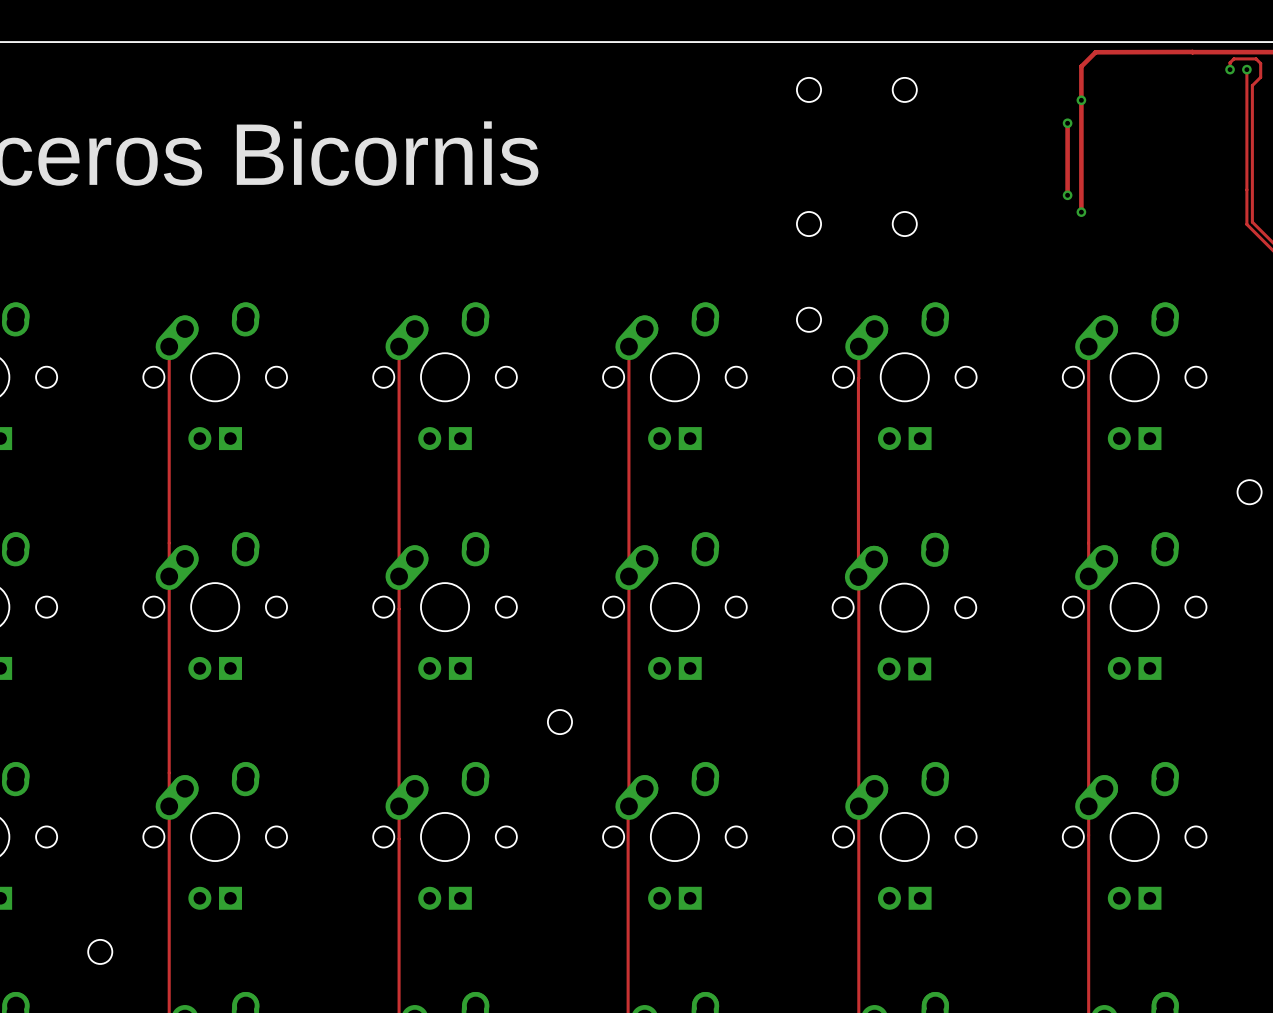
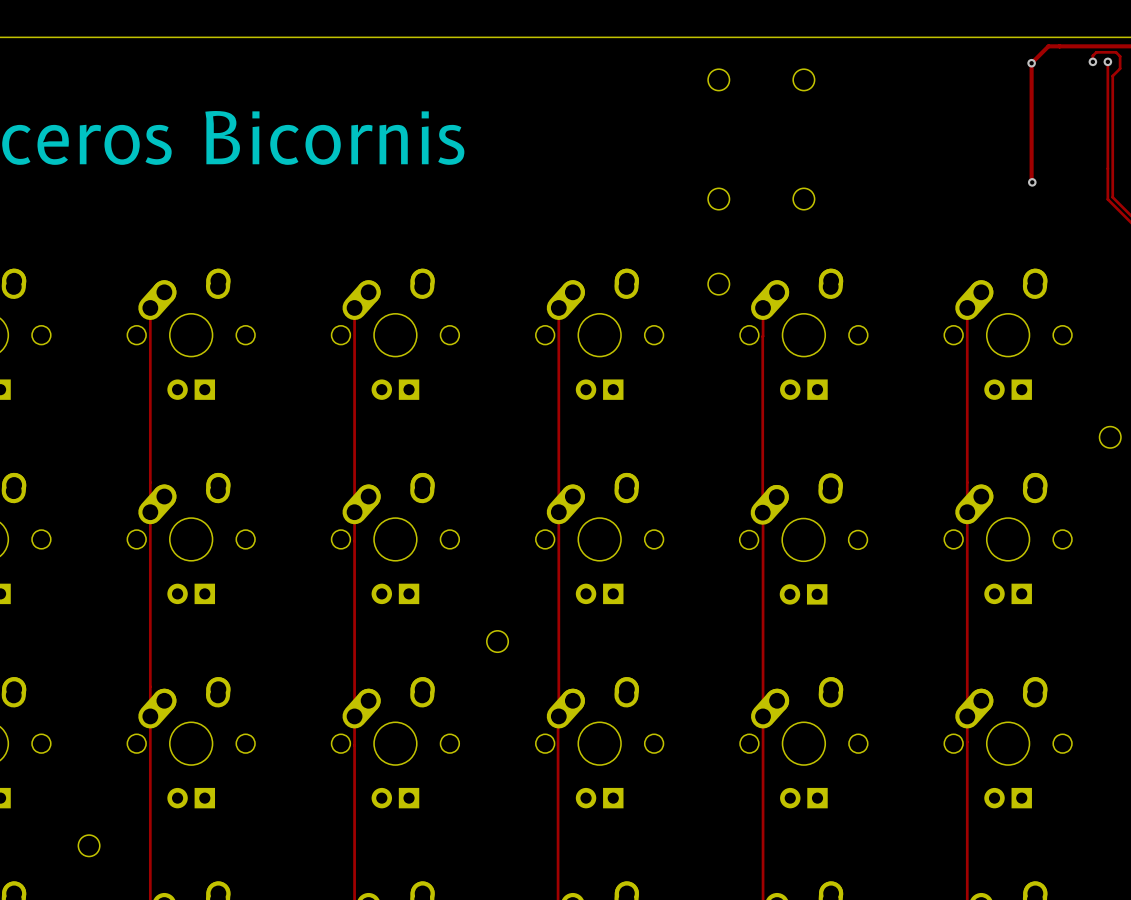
track: (1192, 52) (1095, 52) (1081, 66) (1081, 212) -> (1059, 46) (1048, 46) (1031, 63) (1032, 182)
via: none -> (1031, 63)
via: (1081, 100) -> none
track: (1067, 123) (1067, 195) -> none
via: (1067, 123) -> none
via: (1067, 195) -> none
via: none -> (1032, 182)
via: (1081, 212) -> none

